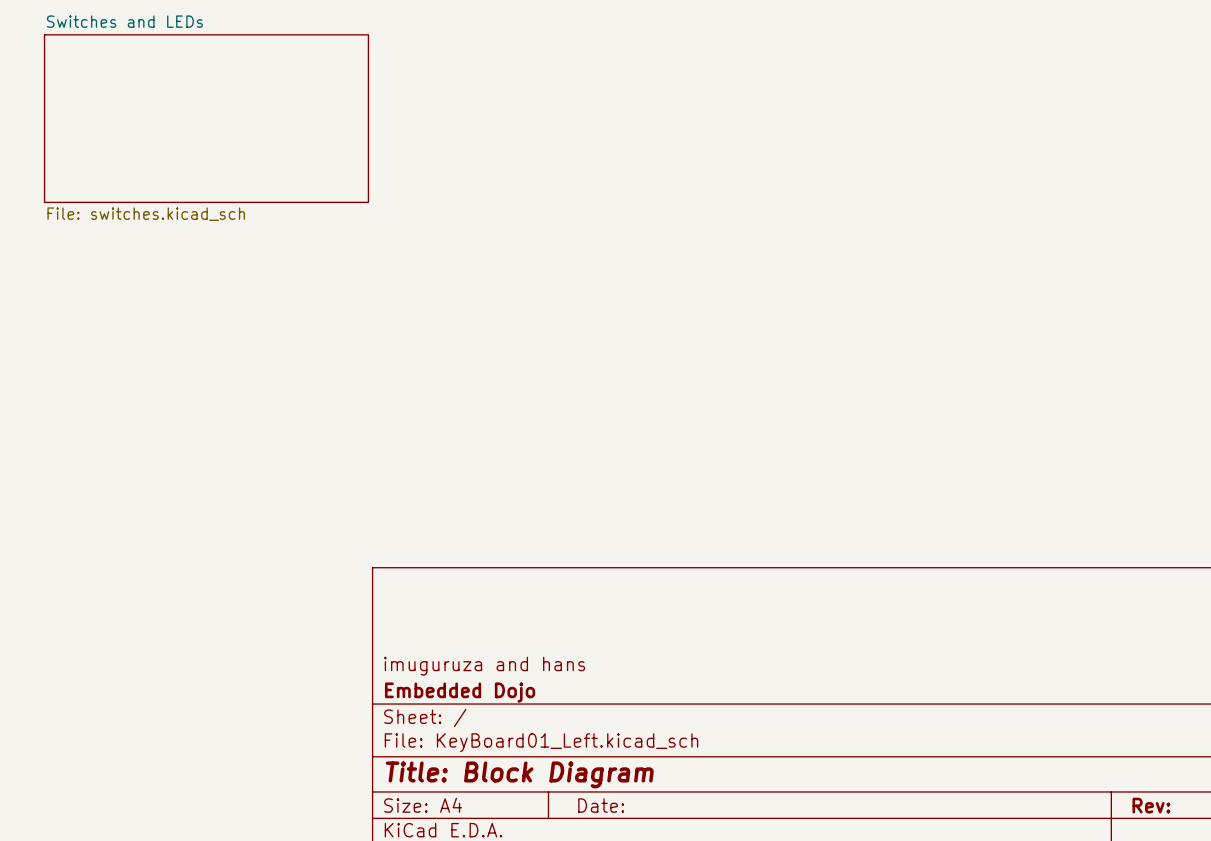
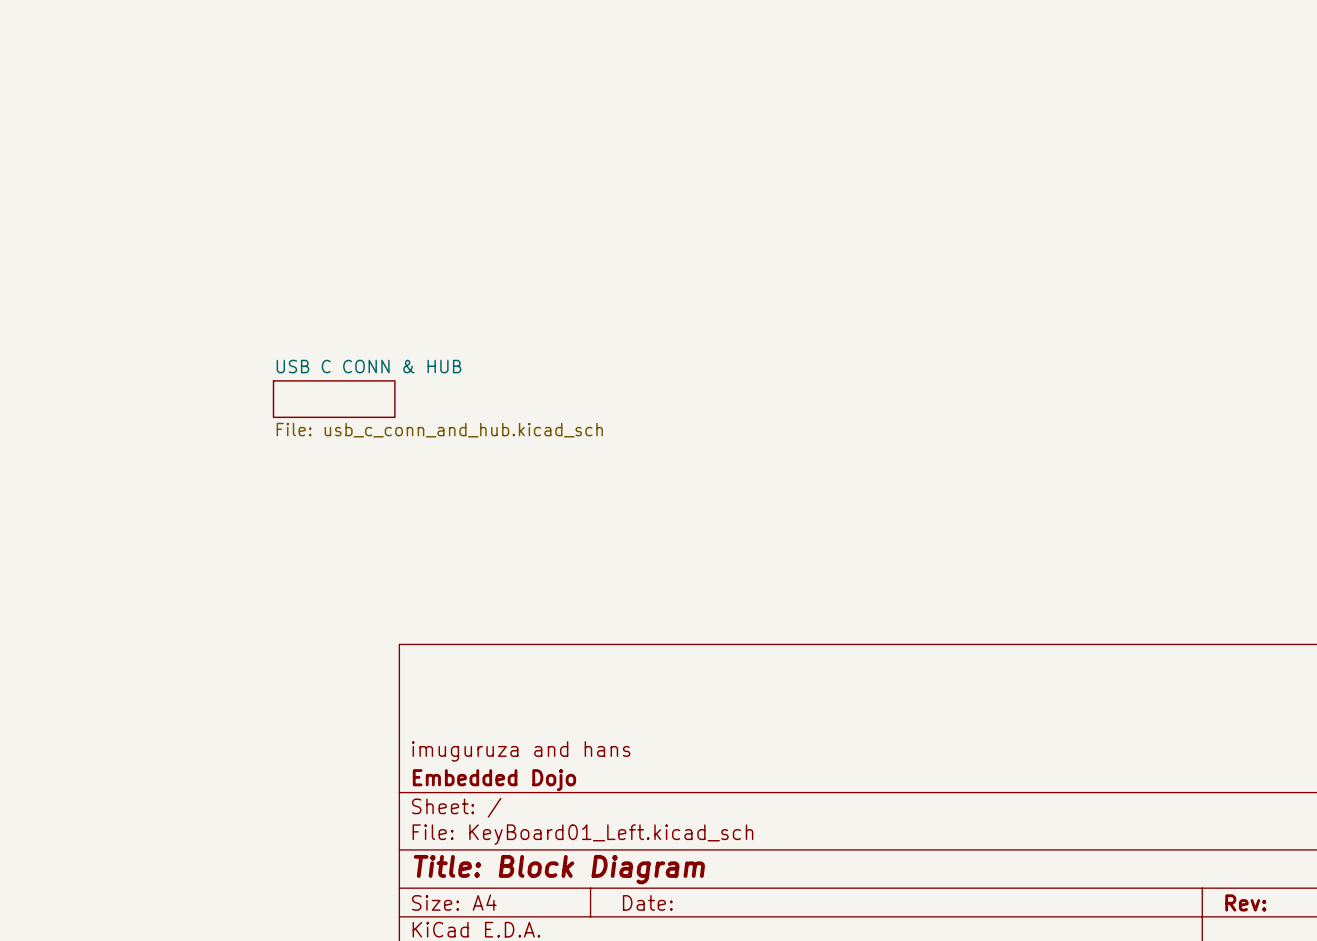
sheet Switches and LEDs: File: switches.kicad_sch (206, 118) -> none
sheet USB C CONN & HUB: none -> File: usb_c_conn_and_hub.kicad_sch (334, 399)

